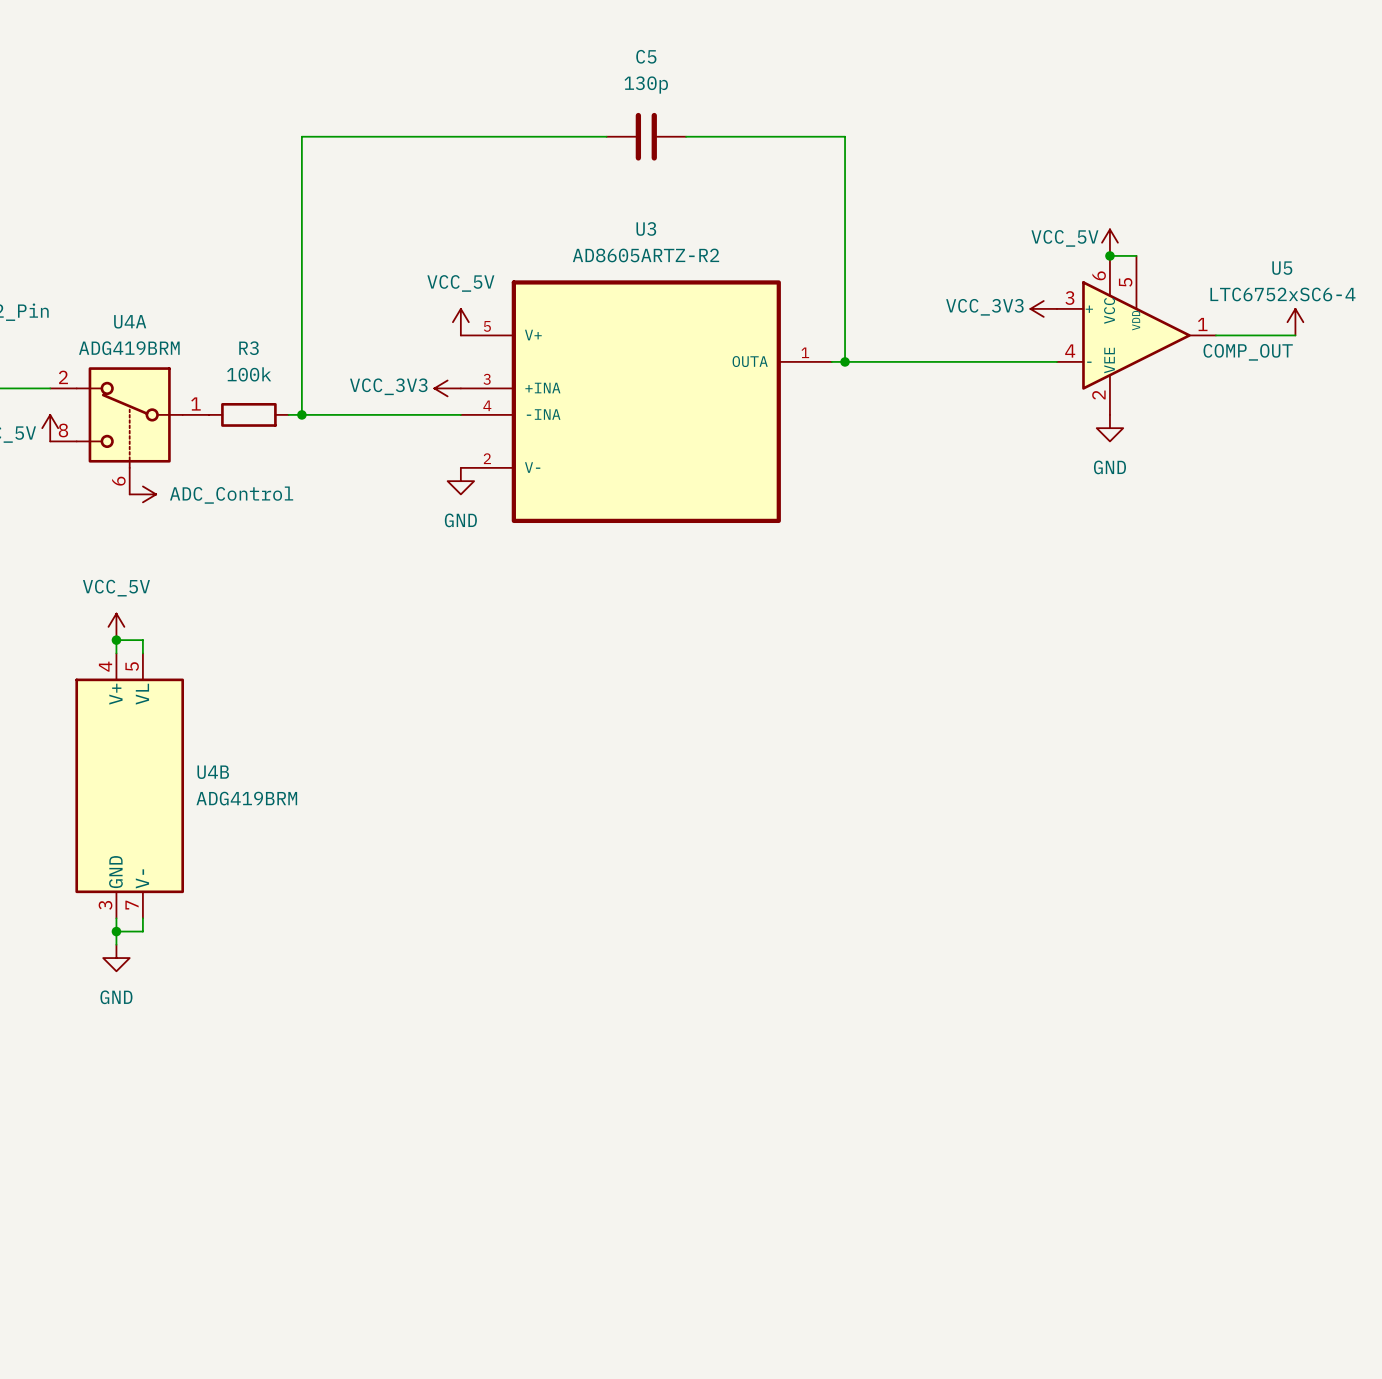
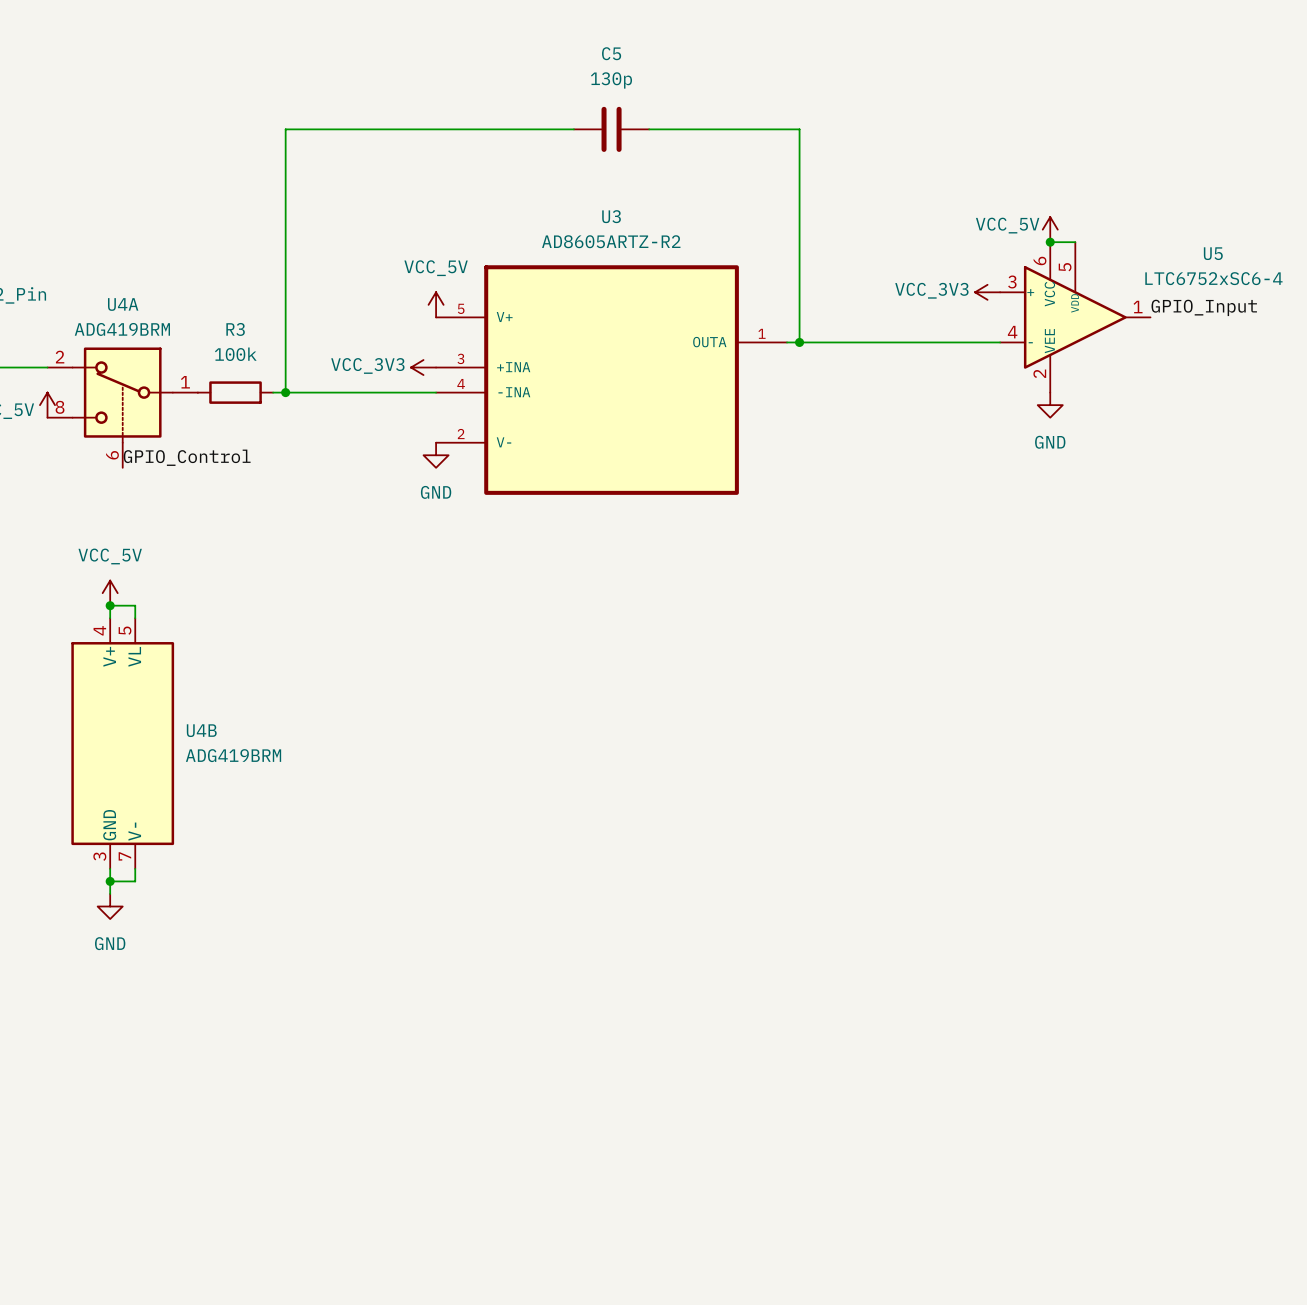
power symbol: COMP_OUT (1295, 322) -> none
label: none -> GPIO_Input (1204, 307)
wire: (1215, 335) (1295, 335) -> none
label: none -> GPIO_Control (187, 457)
power symbol: ADC_Control (142, 494) -> none

